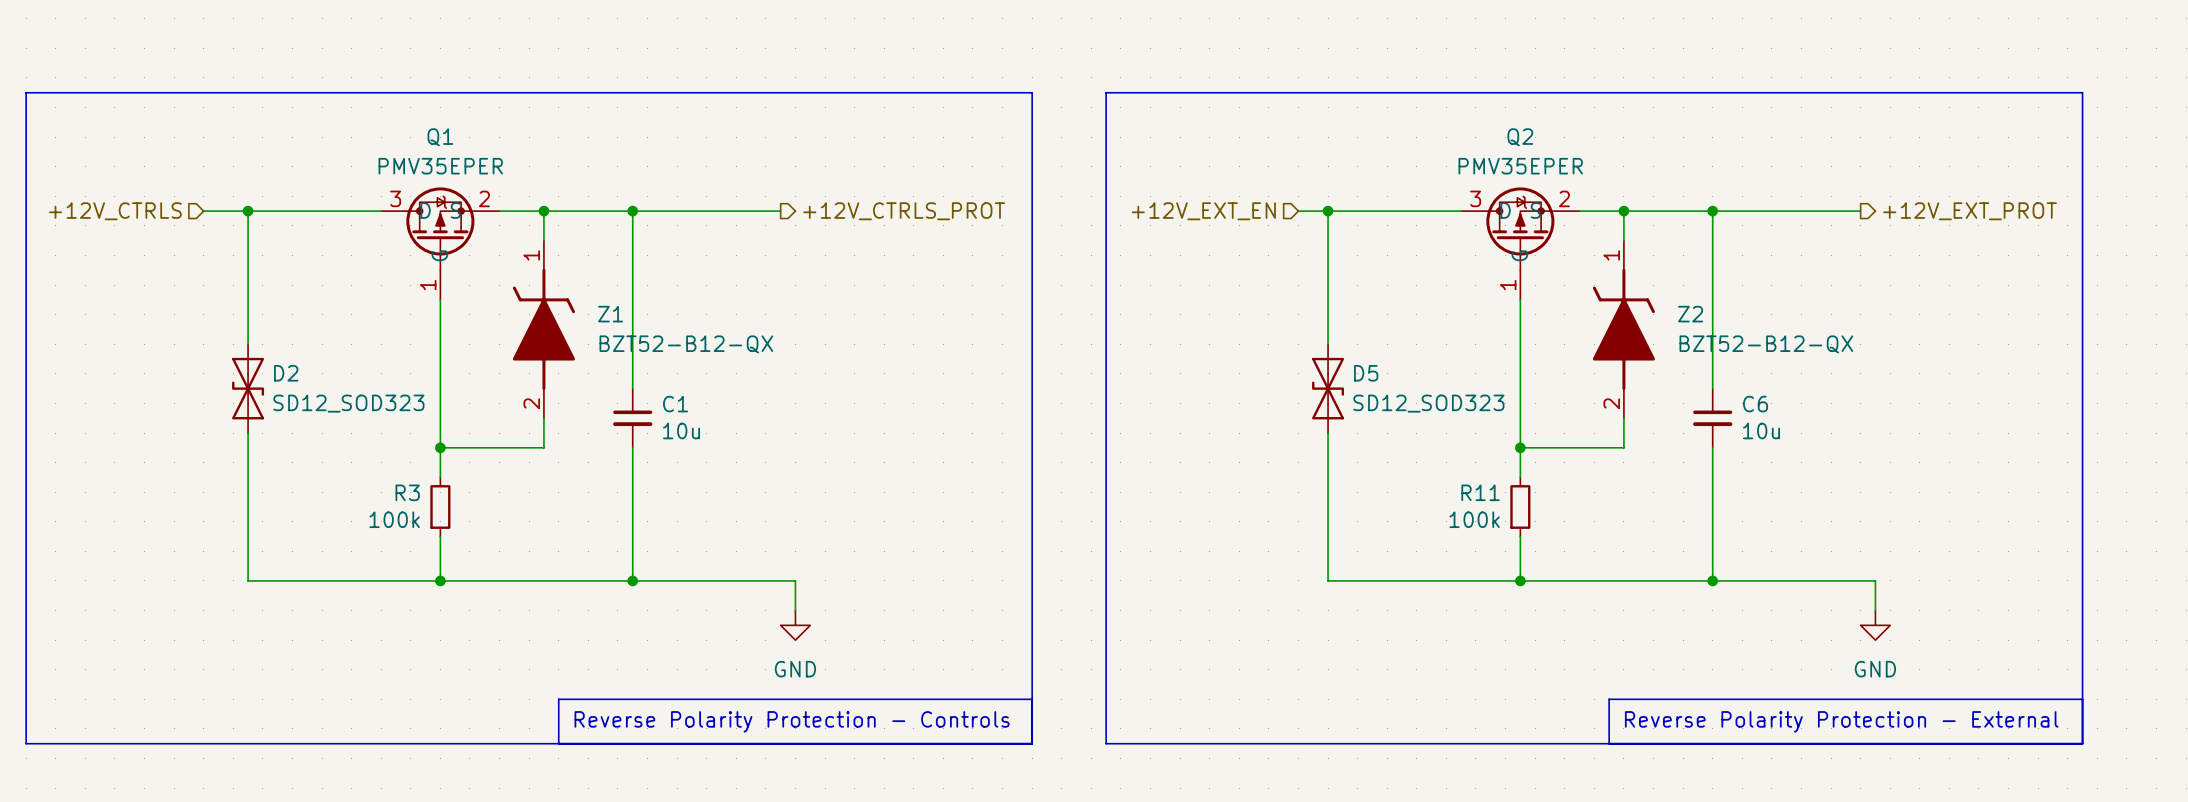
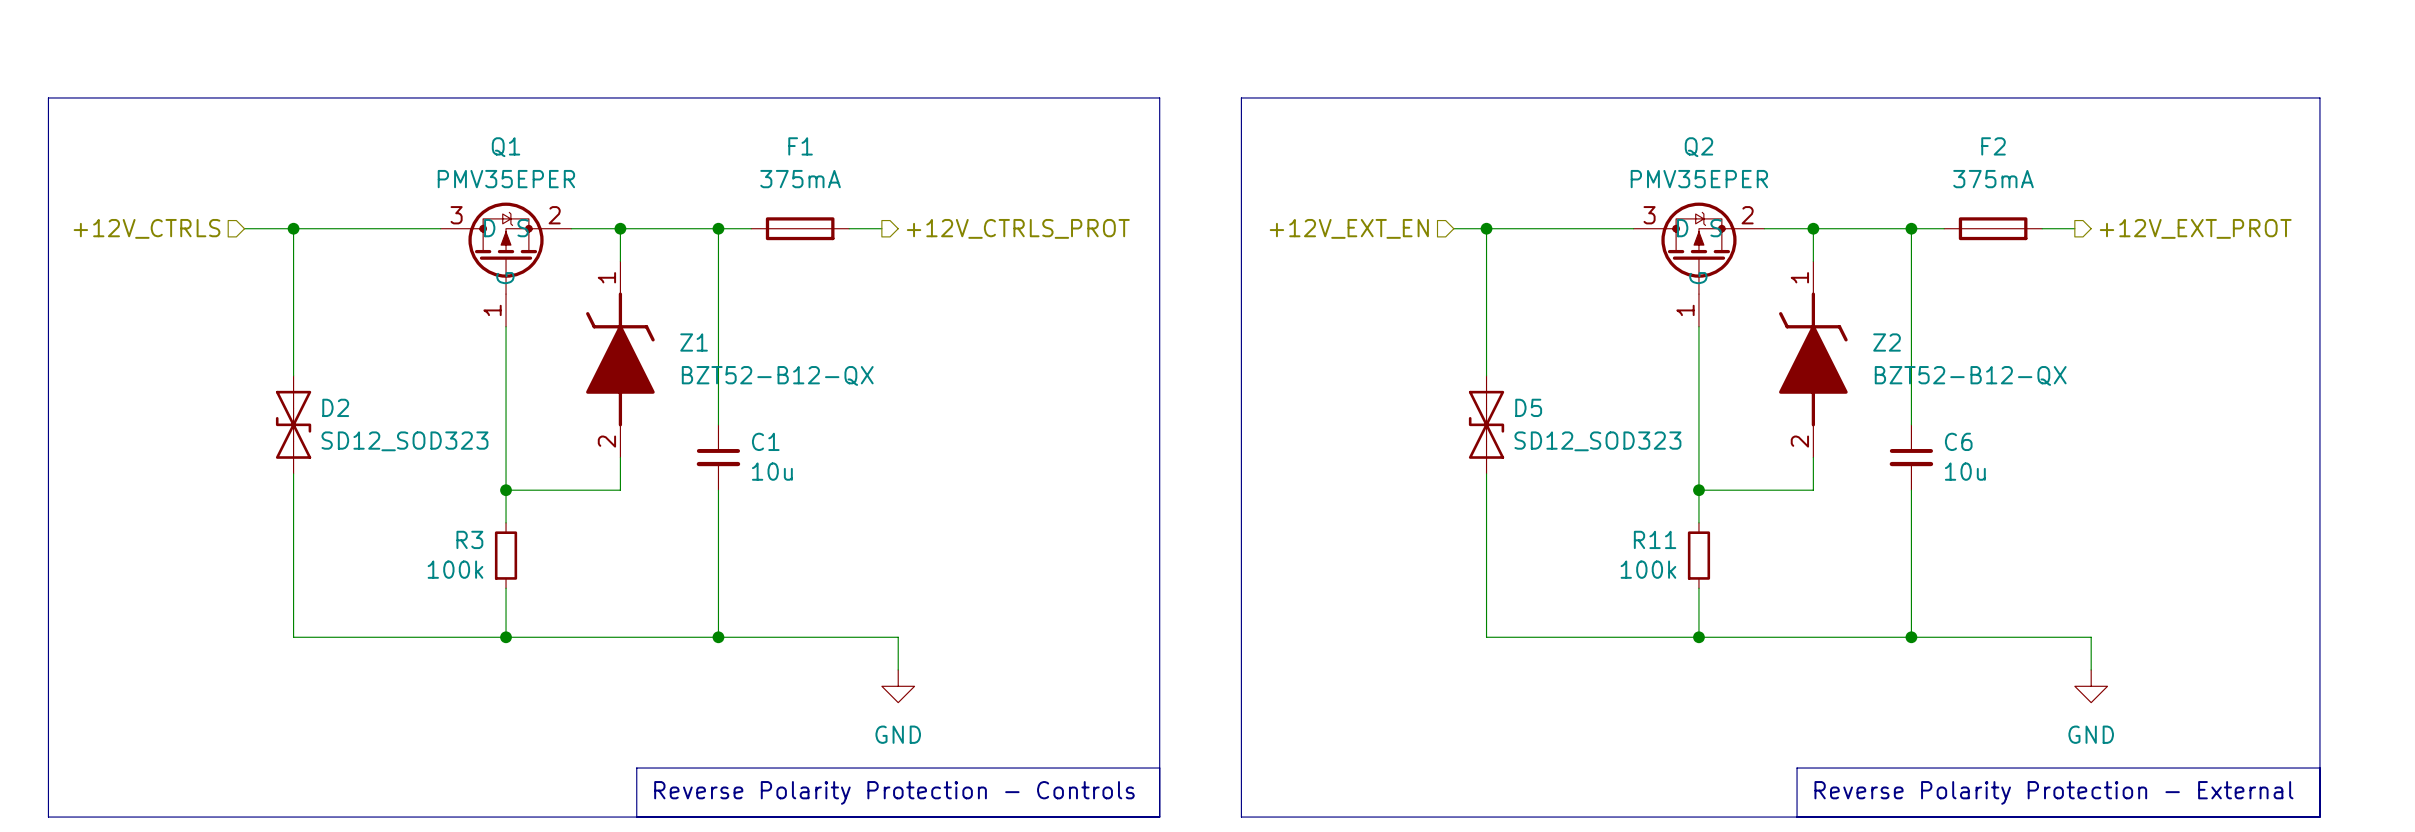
F1: none -> 375mA (800, 228)
F2: none -> 375mA (1993, 228)

